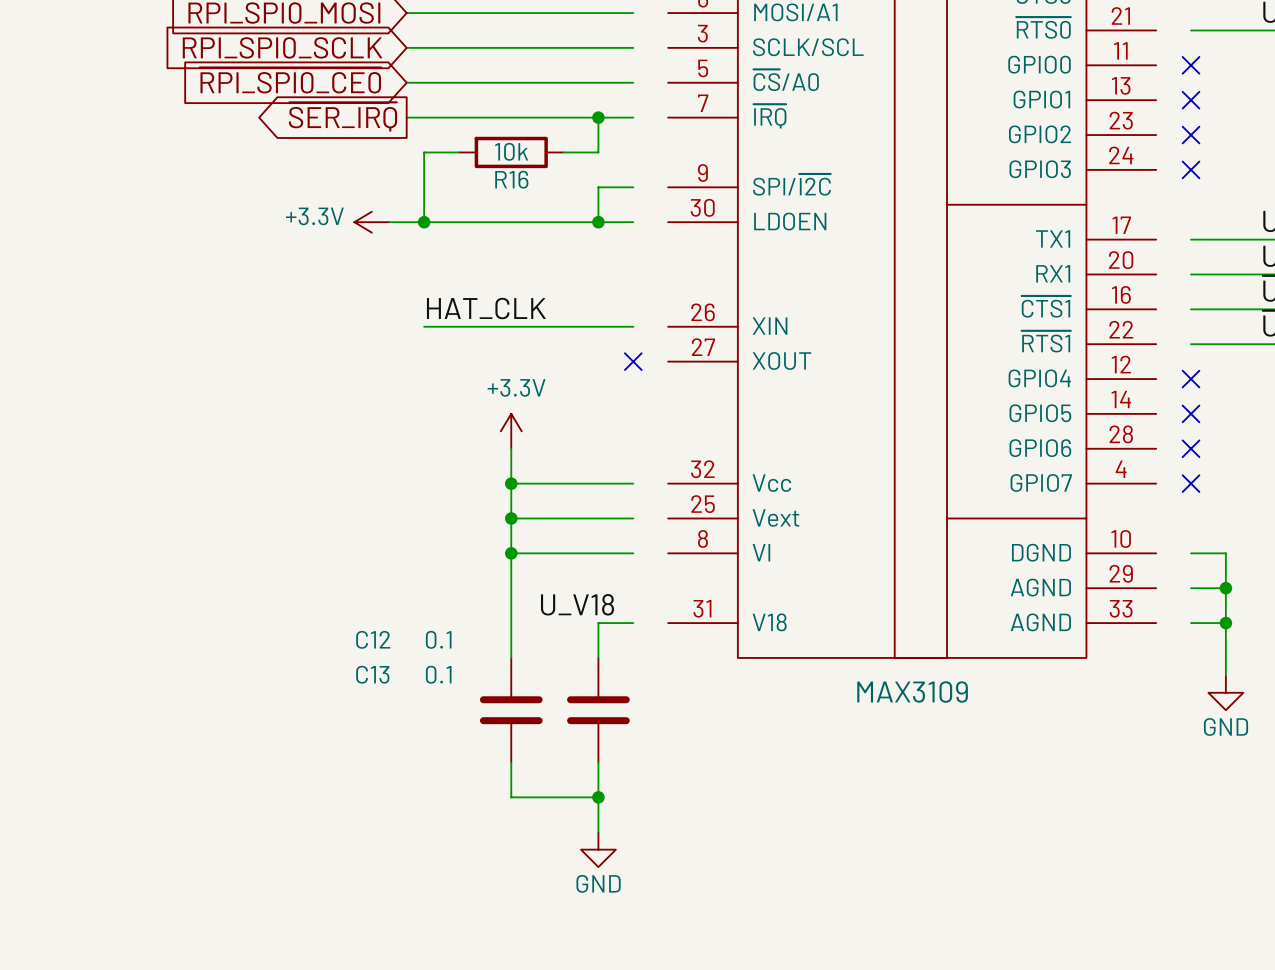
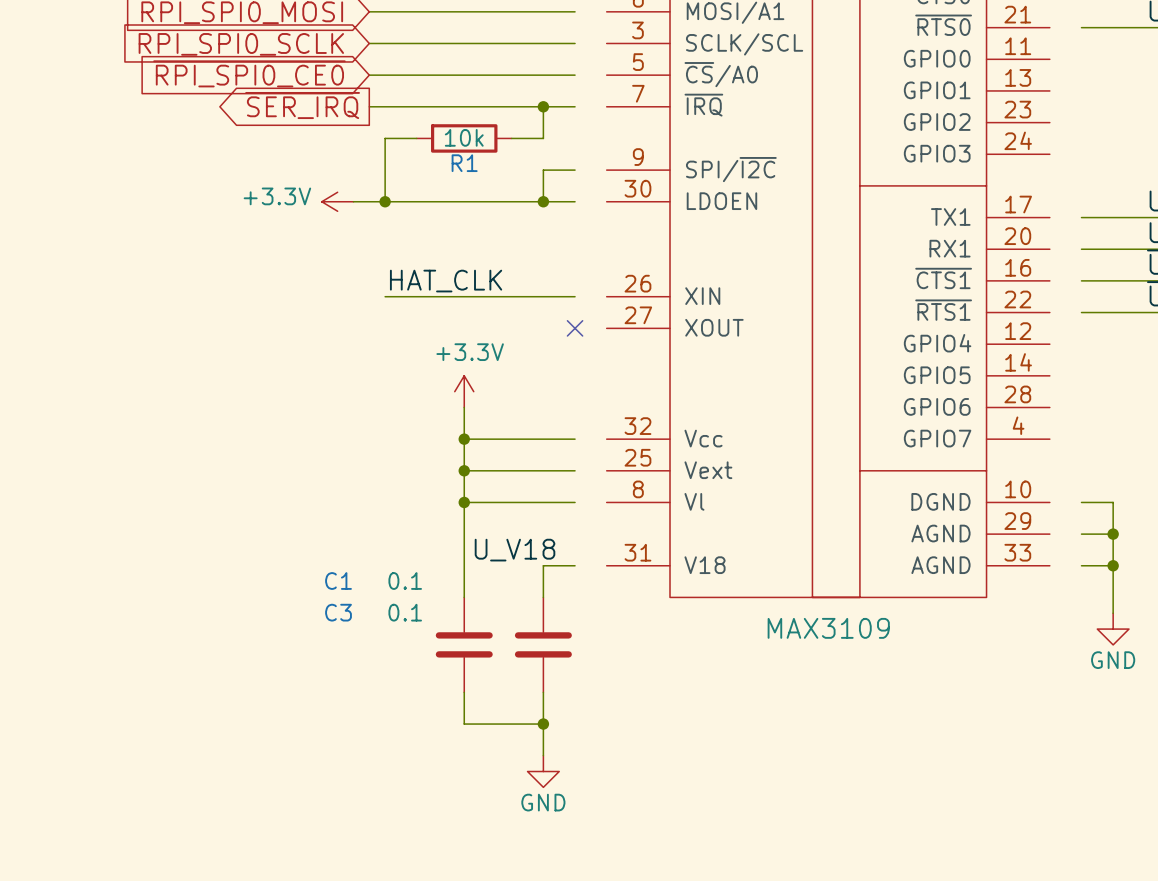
no-connect mark: (1191, 65) -> none
no-connect mark: (1191, 100) -> none
no-connect mark: (1191, 135) -> none
no-connect mark: (1191, 169) -> none
R16 name: R16 (511, 179) -> R1 (464, 163)
no-connect mark: (1191, 379) -> none
no-connect mark: (1191, 413) -> none
no-connect mark: (1191, 448) -> none
no-connect mark: (1191, 483) -> none
C12 name: C12 (373, 639) -> C1 (338, 581)
C13 name: C13 (372, 674) -> C3 (338, 612)

